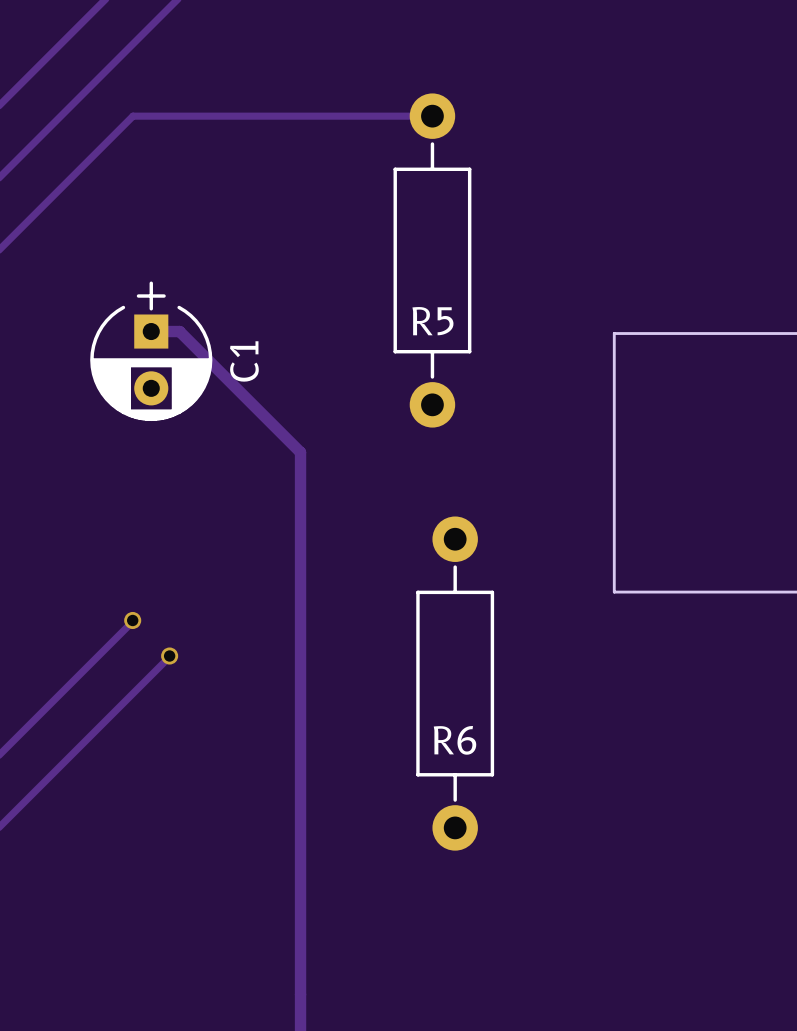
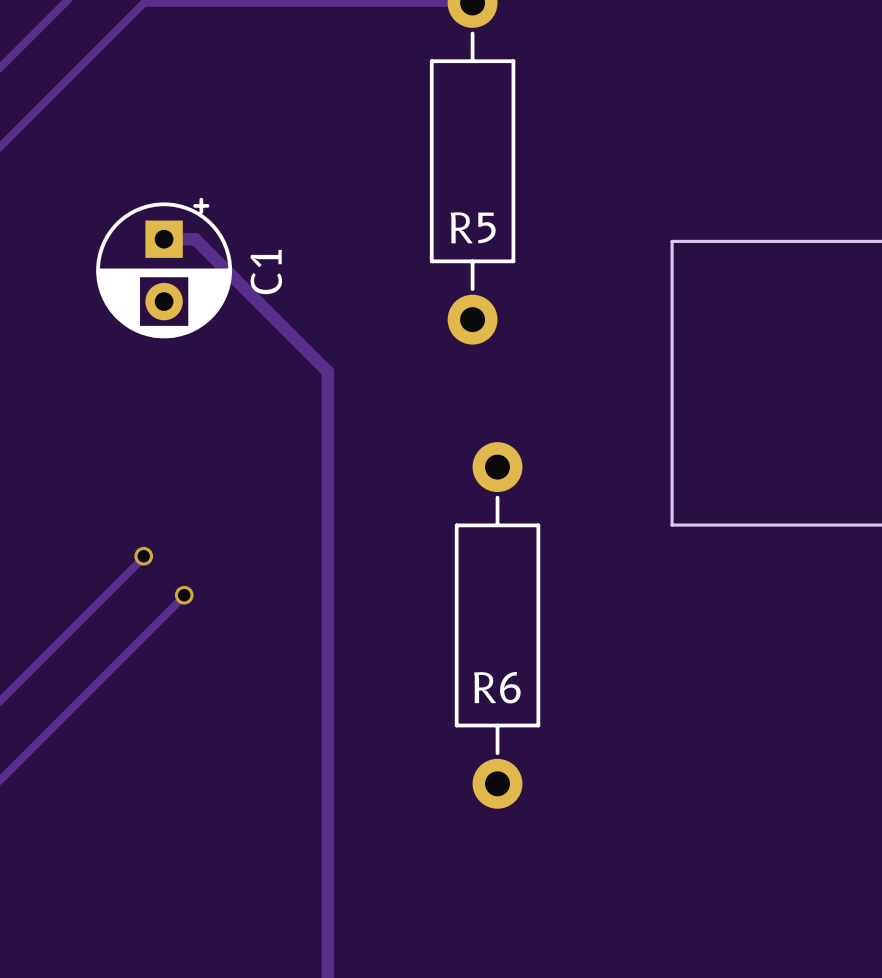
C1 footprint: [90, 281, 213, 422] -> [96, 197, 233, 339]

